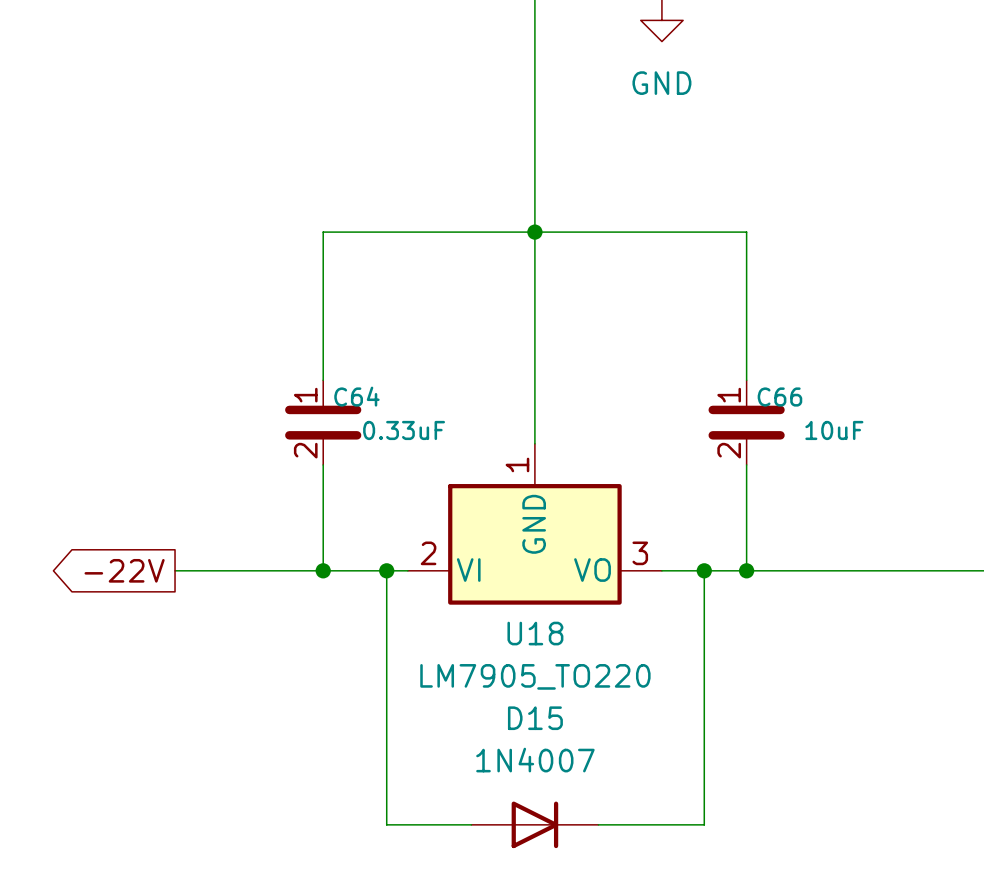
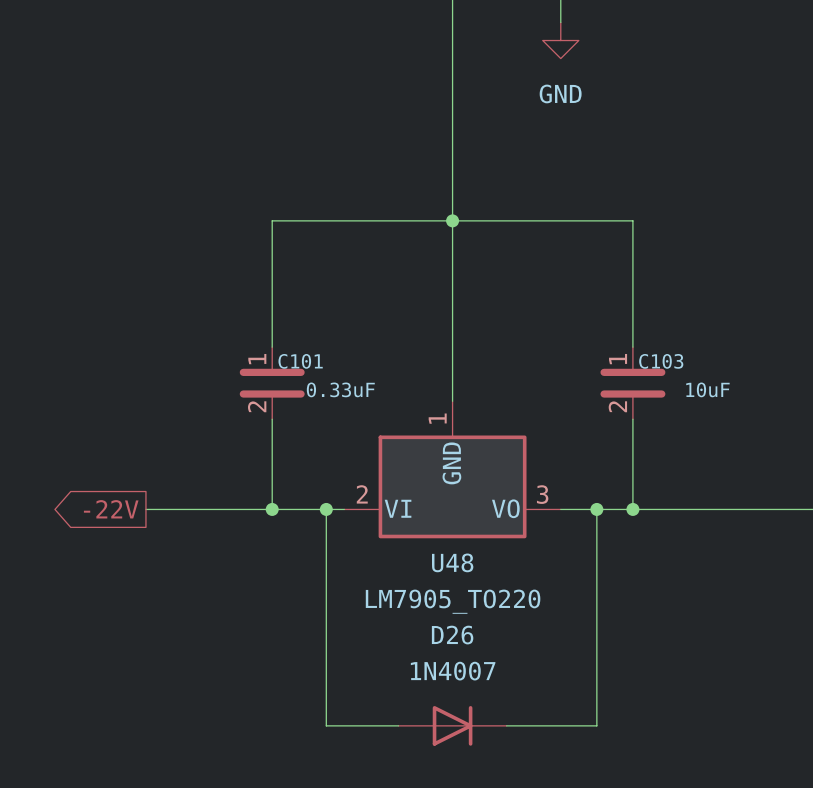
C64 name: C64 (356, 396) -> C101 (300, 361)
C66 name: C66 (779, 397) -> C103 (661, 361)
U18 name: U18 (535, 633) -> U48 (452, 562)
D15 name: D15 (535, 718) -> D26 (452, 635)

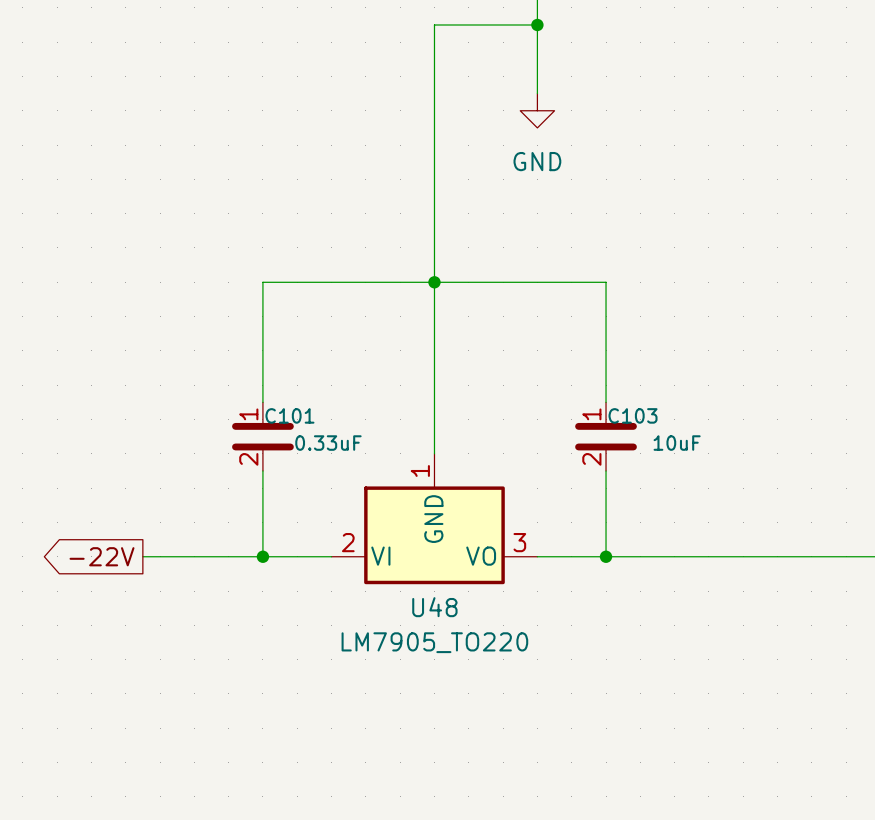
wire: (326, 509) (326, 725) (398, 725) -> none
junction: (326, 509) -> none
wire: (596, 509) (596, 725) (506, 725) -> none
junction: (596, 509) -> none
D26: 1N4007 (452, 725) -> none

